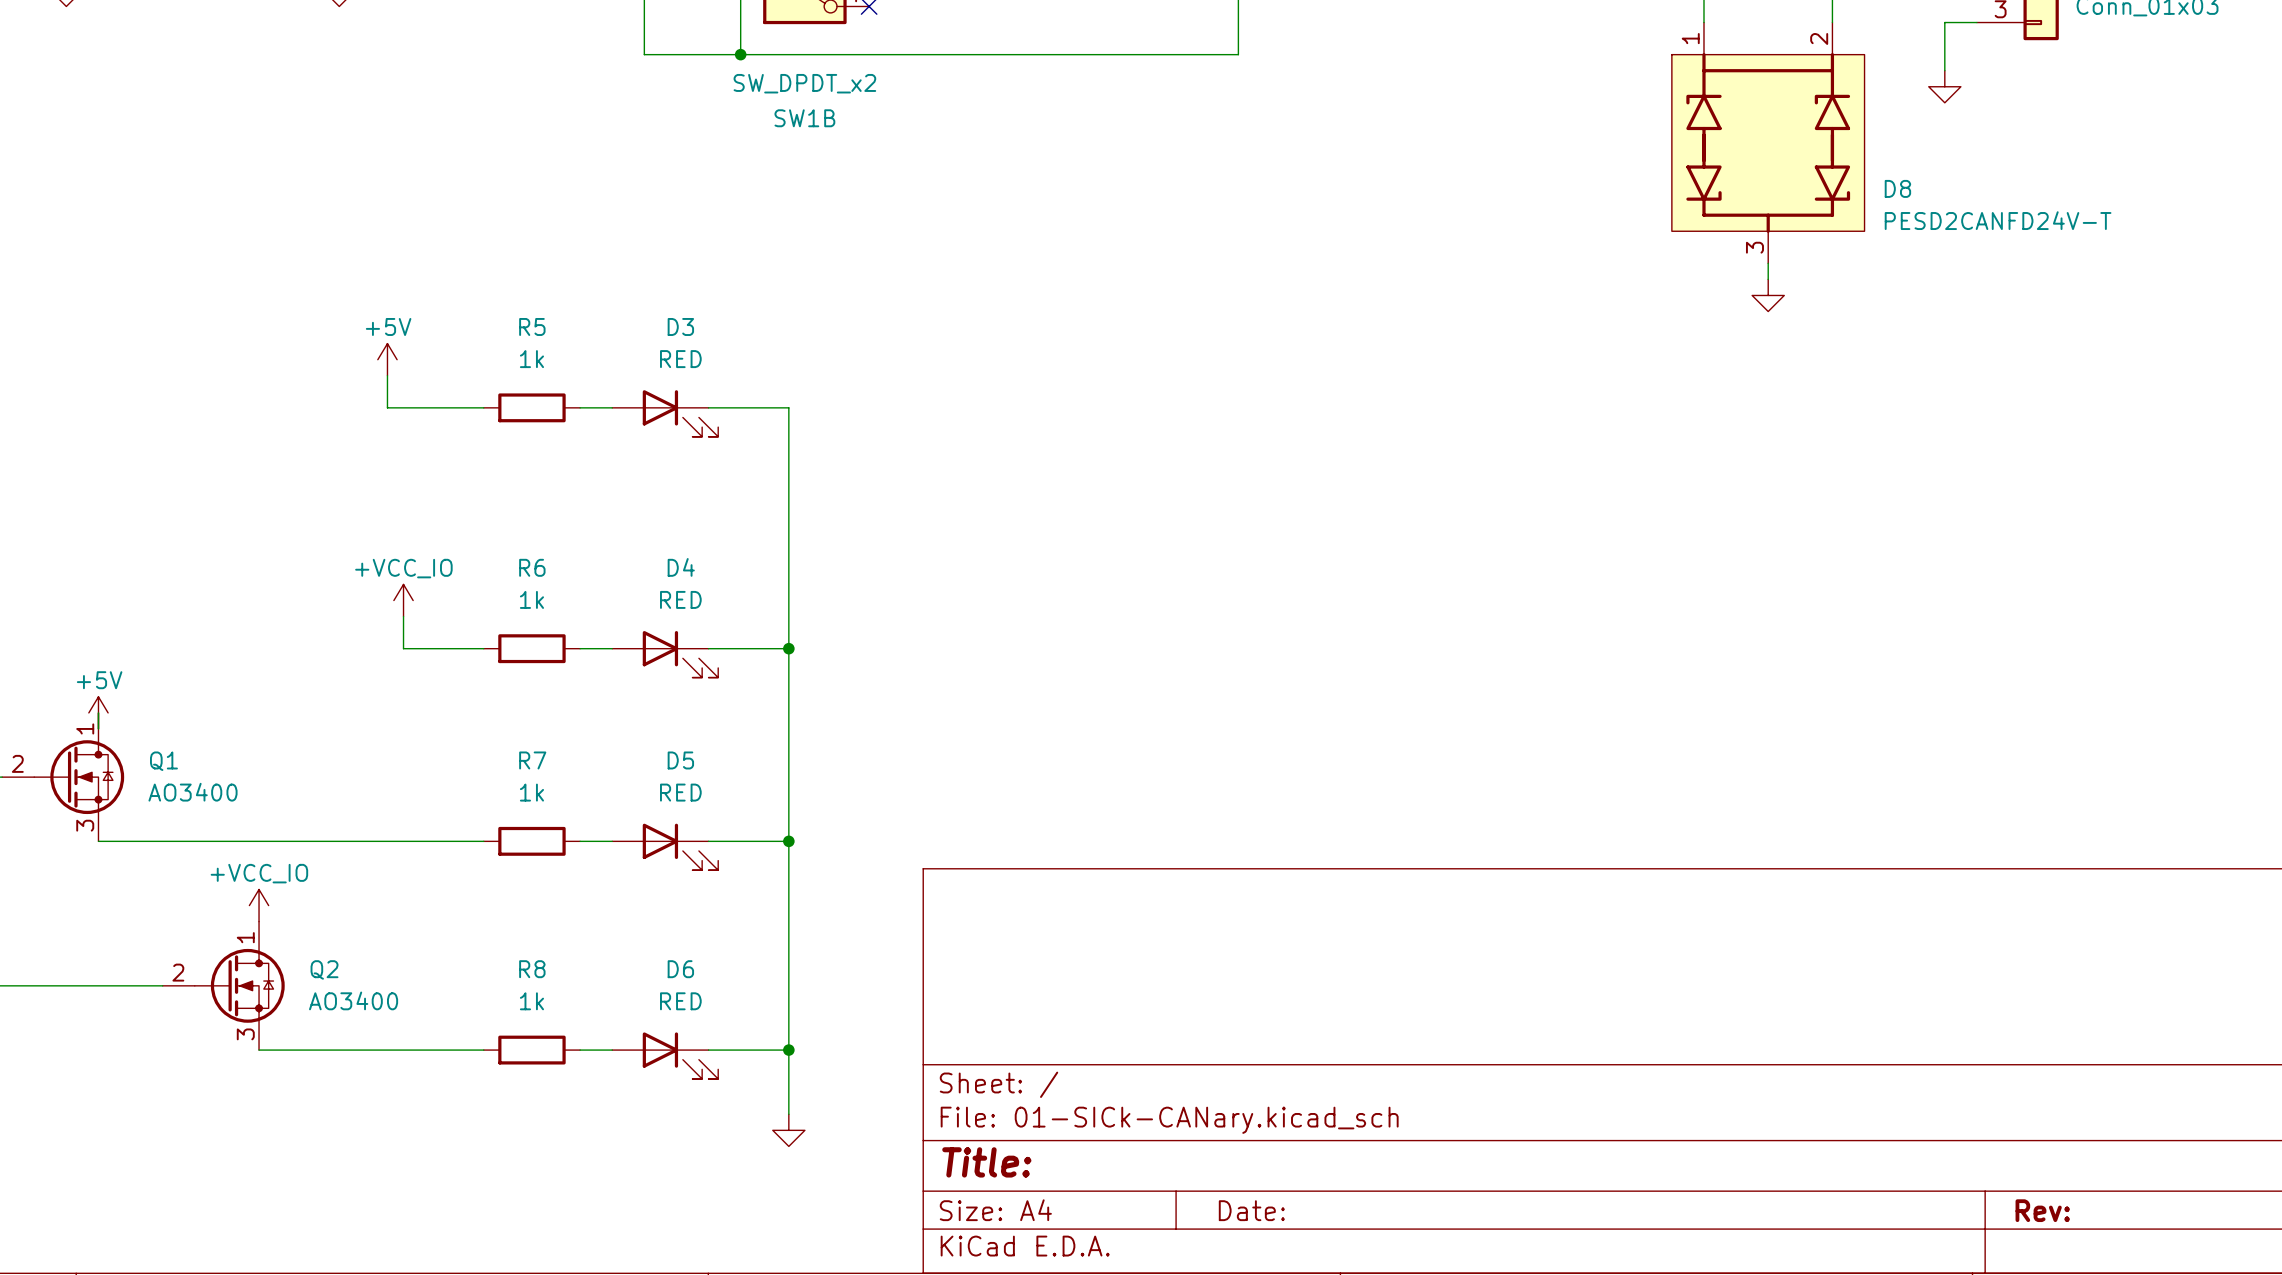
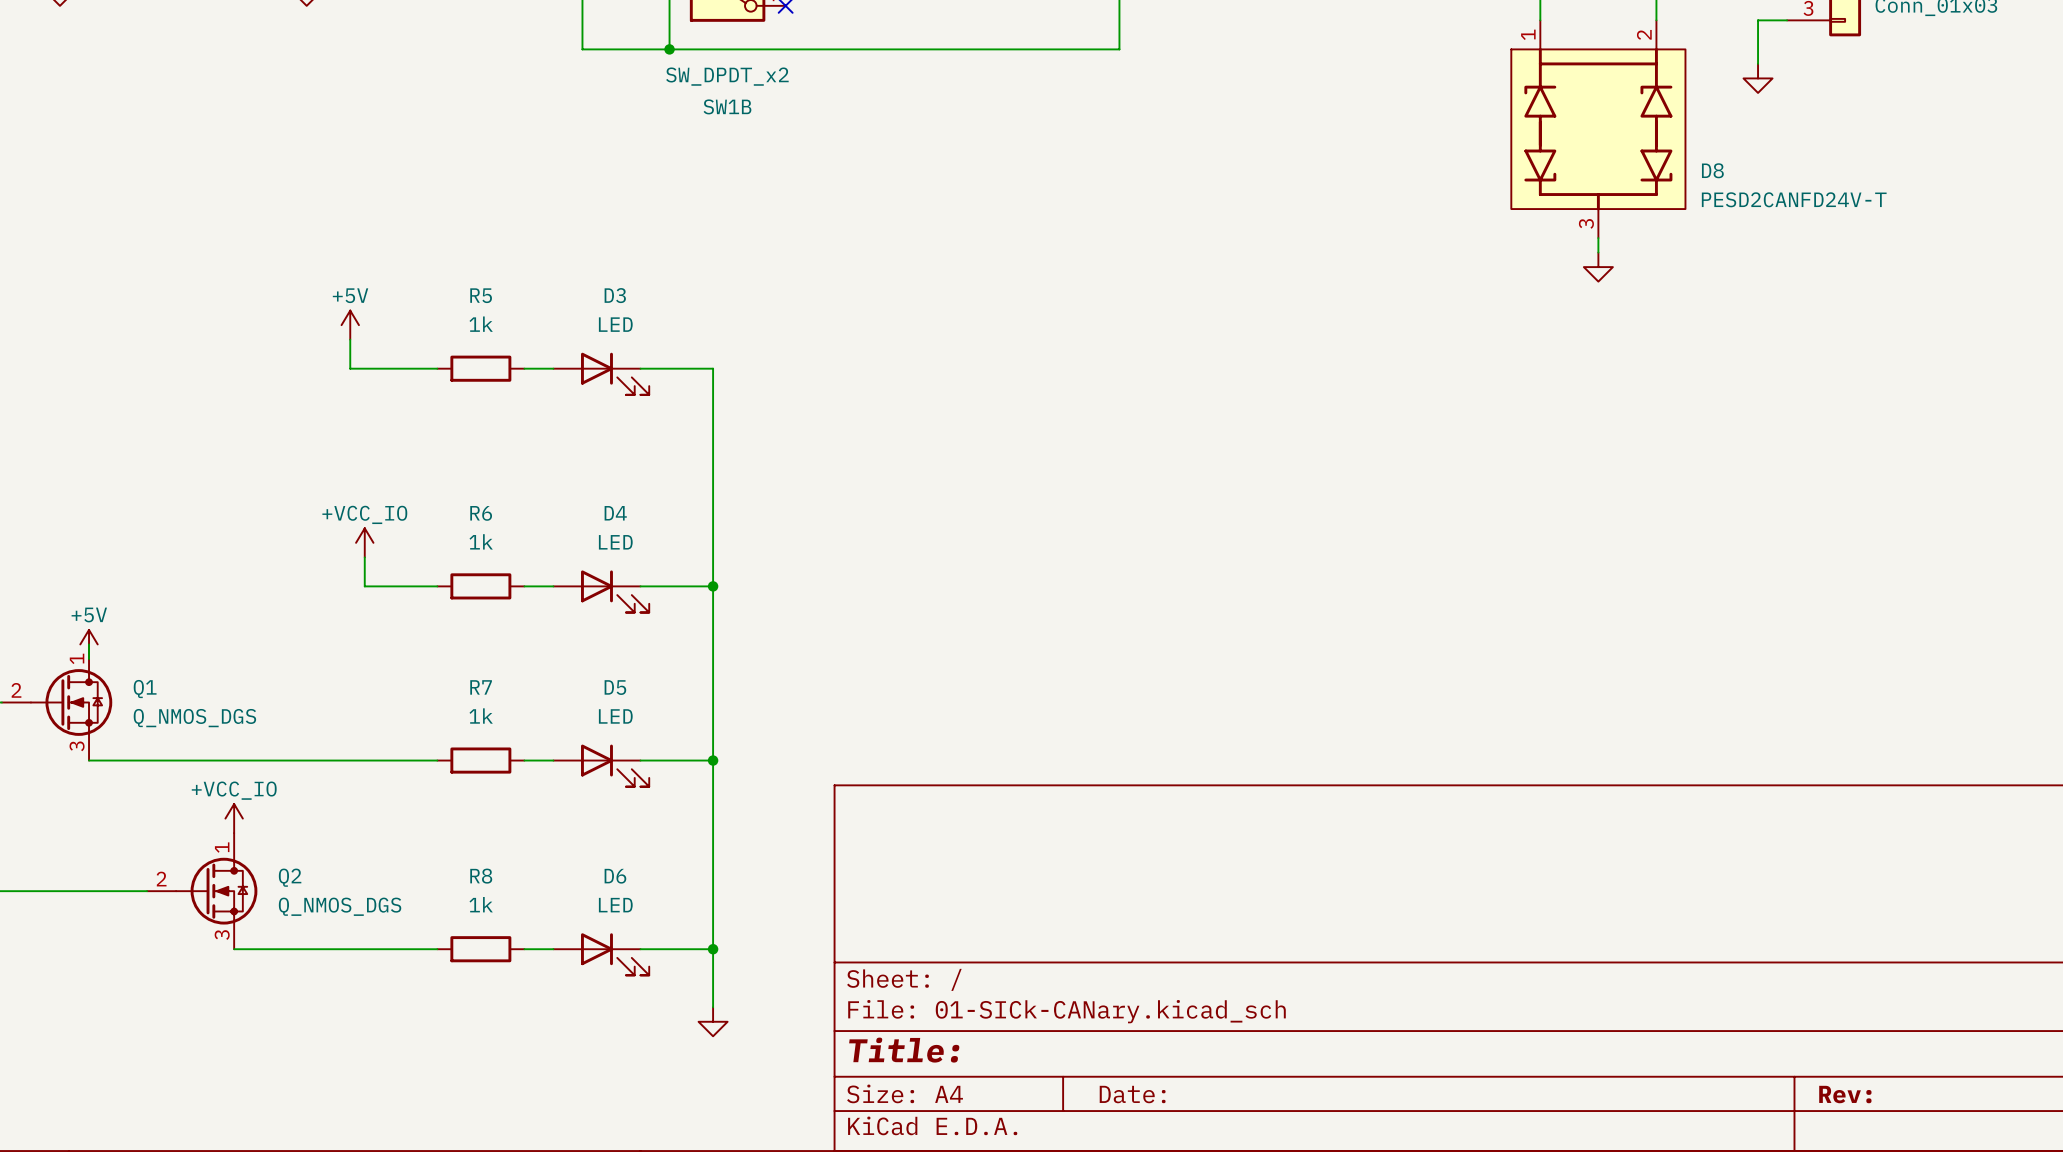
D3 value: RED (680, 359) -> LED (615, 324)
D4 value: RED (680, 599) -> LED (615, 542)
Q1 value: AO3400 (193, 792) -> Q_NMOS_DGS (194, 718)
D5 value: RED (680, 792) -> LED (615, 716)
Q2 value: AO3400 (353, 1000) -> Q_NMOS_DGS (340, 906)
D6 value: RED (680, 1001) -> LED (615, 905)

